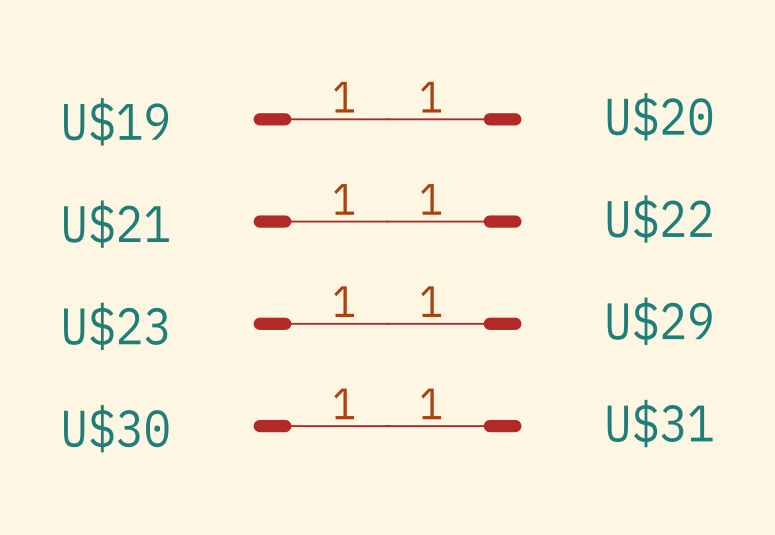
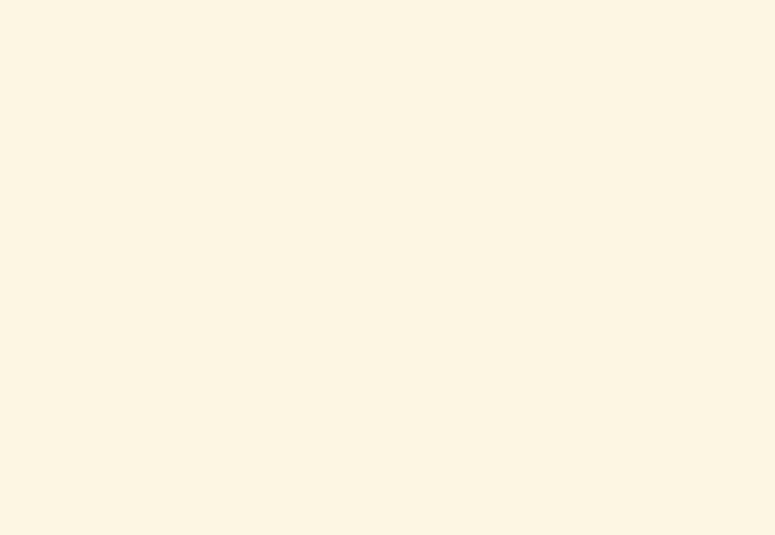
U$19: (320, 119) -> none
U$20: (454, 119) -> none
U$21: (320, 221) -> none
U$22: (454, 221) -> none
U$23: (320, 323) -> none
U$29: (454, 323) -> none
U$30: (320, 426) -> none
U$31: (454, 426) -> none

